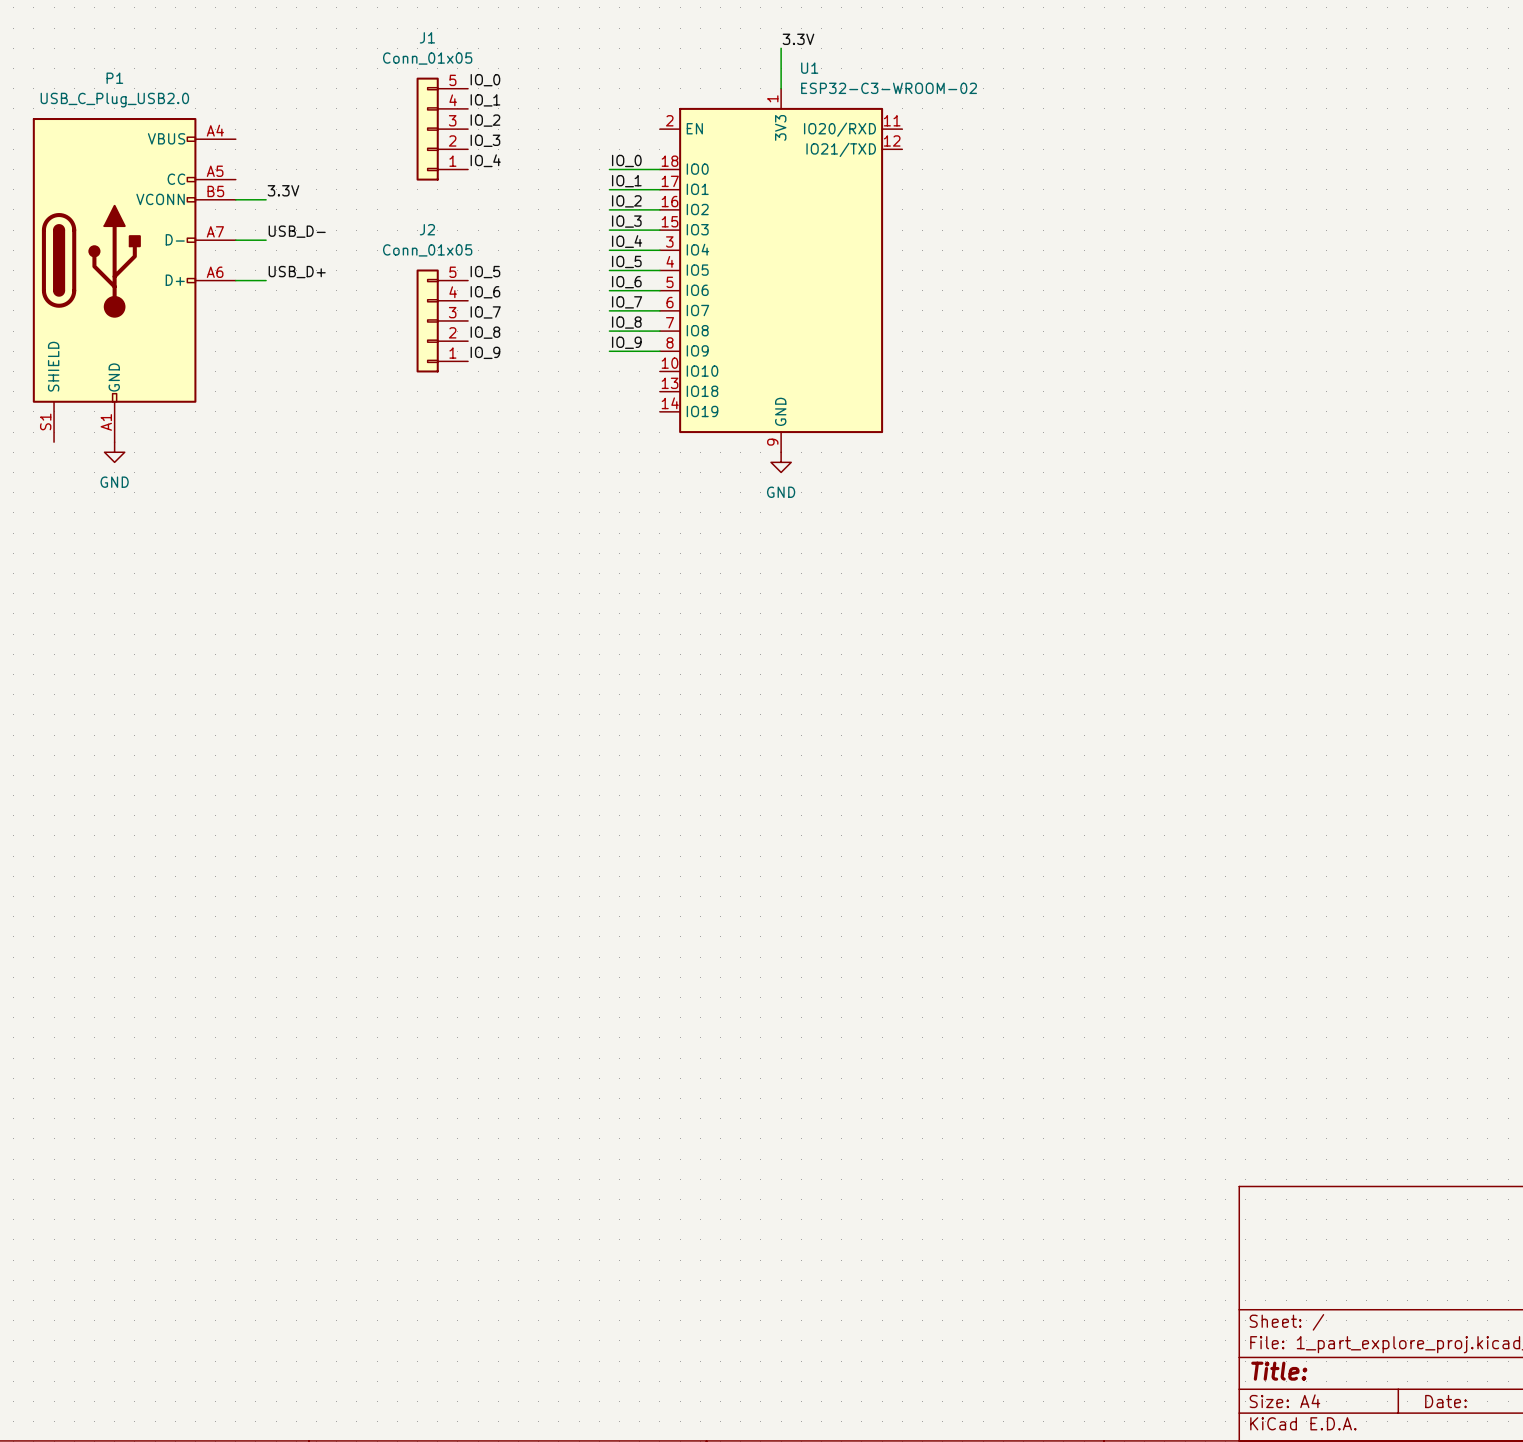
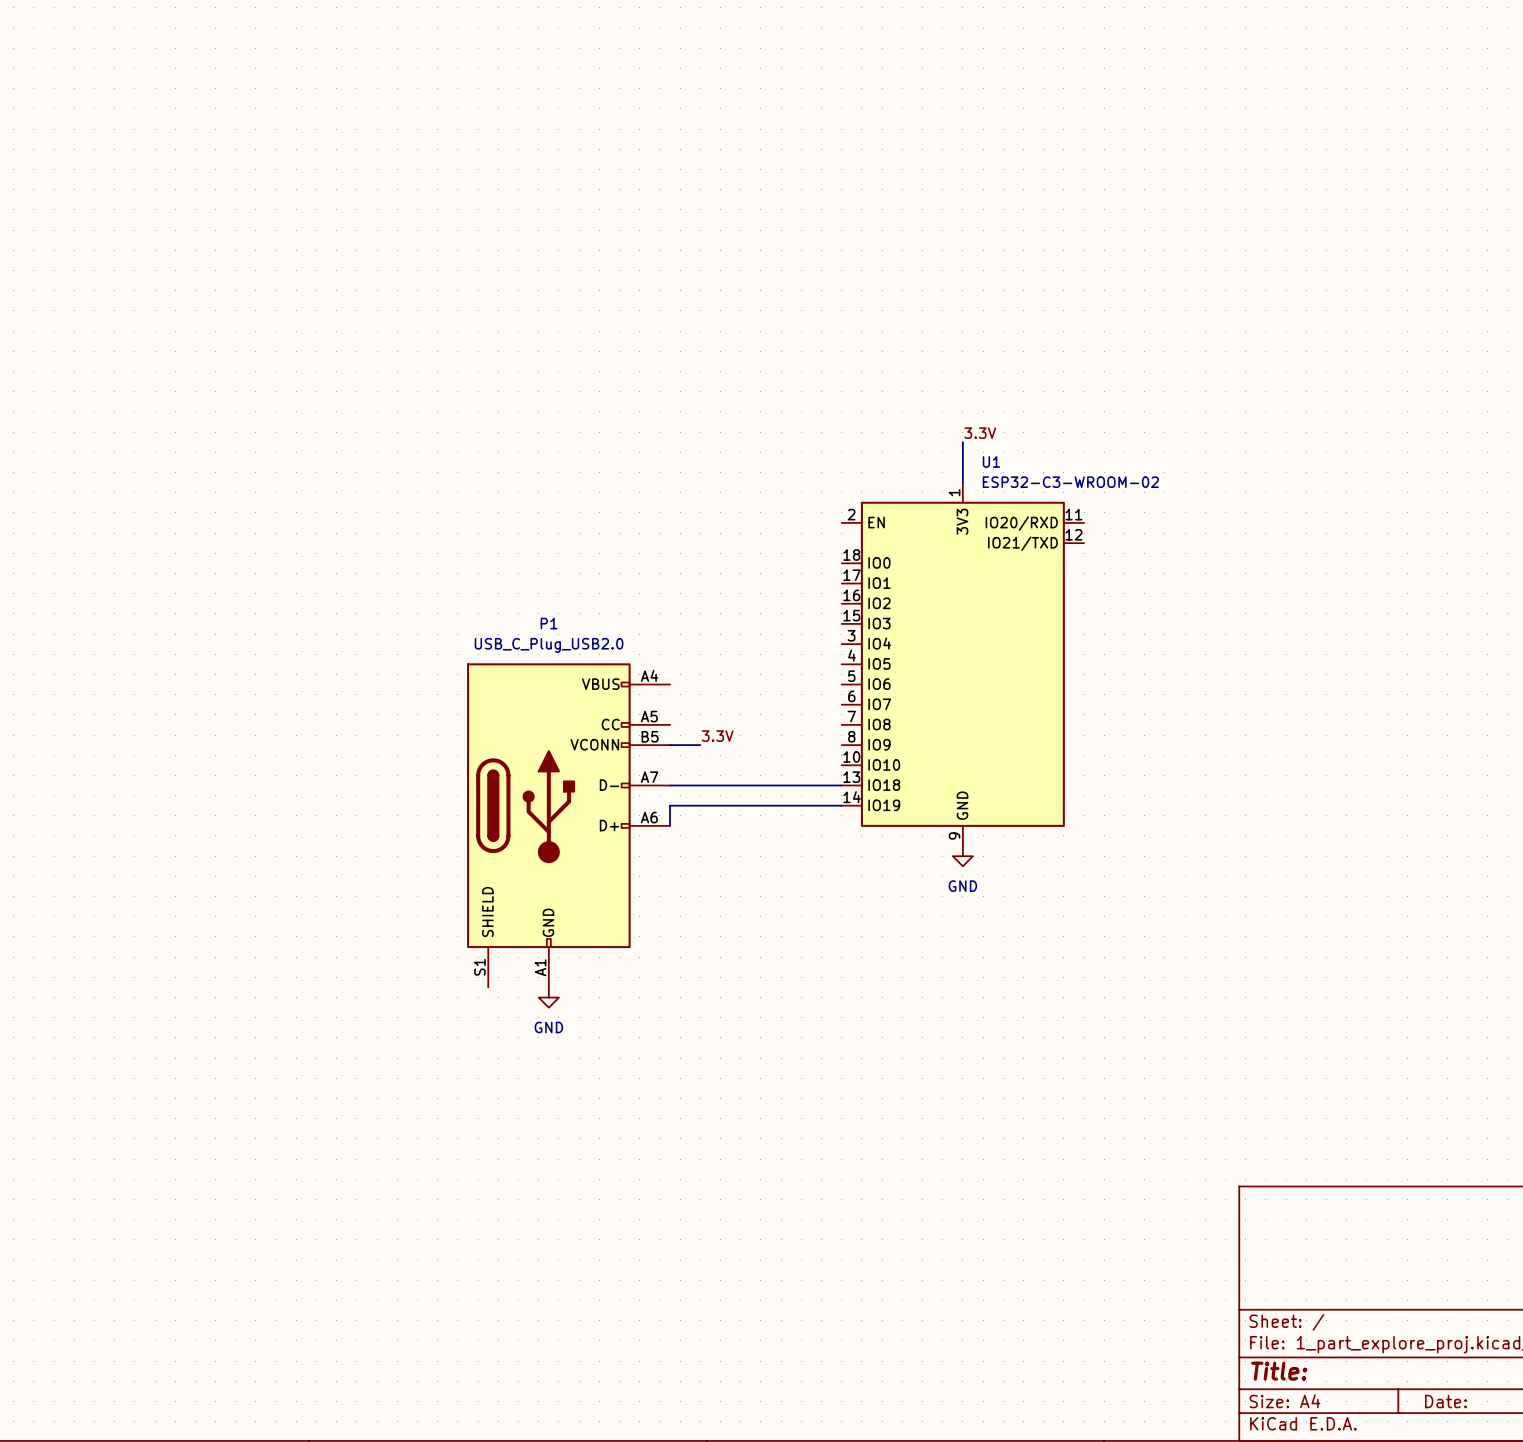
label: 3.3V (798, 39) -> none
wire: (781, 48) (781, 88) -> none
label: IO_0 (485, 80) -> none
label: IO_1 (485, 100) -> none
label: IO_2 (485, 120) -> none
J1: Conn_01x05 (442, 129) -> none
label: IO_3 (485, 140) -> none
label: IO_4 (485, 160) -> none
label: IO_0 (626, 160) -> none
wire: (609, 169) (659, 169) -> none
label: IO_1 (626, 181) -> none
wire: (609, 189) (659, 189) -> none
label: 3.3V (283, 190) -> none
wire: (235, 199) (266, 199) -> none
label: IO_2 (626, 201) -> none
wire: (609, 209) (659, 209) -> none
label: IO_3 (626, 221) -> none
wire: (609, 230) (659, 230) -> none
label: USB_D- (297, 231) -> none
wire: (235, 240) (266, 240) -> none
label: IO_4 (627, 241) -> none
wire: (609, 250) (659, 250) -> none
label: IO_5 (626, 261) -> none
wire: (609, 270) (659, 270) -> none
U1 position: (781, 270) -> (962, 664)
label: USB_D+ (297, 272) -> none
label: IO_5 (485, 272) -> none
P1 position: (134, 280) -> (568, 825)
wire: (235, 280) (266, 280) -> none
label: IO_6 (626, 282) -> none
wire: (609, 290) (659, 290) -> none
label: IO_6 (485, 292) -> none
label: IO_7 (627, 302) -> none
wire: (609, 310) (659, 310) -> none
label: IO_7 (485, 312) -> none
J2: Conn_01x05 (442, 320) -> none
label: IO_8 (626, 322) -> none
wire: (609, 331) (659, 331) -> none
label: IO_8 (485, 332) -> none
label: IO_9 (626, 342) -> none
wire: (609, 351) (659, 351) -> none
label: IO_9 (485, 352) -> none
label: none -> 3.3V (980, 433)
wire: none -> (962, 442) (962, 482)
power symbol: GND (114, 452) -> none
power symbol: GND (781, 462) -> none
label: none -> 3.3V (717, 736)
wire: none -> (670, 745) (700, 745)
wire: none -> (670, 785) (841, 785)
wire: none -> (841, 805) (670, 805) (670, 825)
power symbol: none -> GND (962, 856)
power symbol: none -> GND (548, 997)

